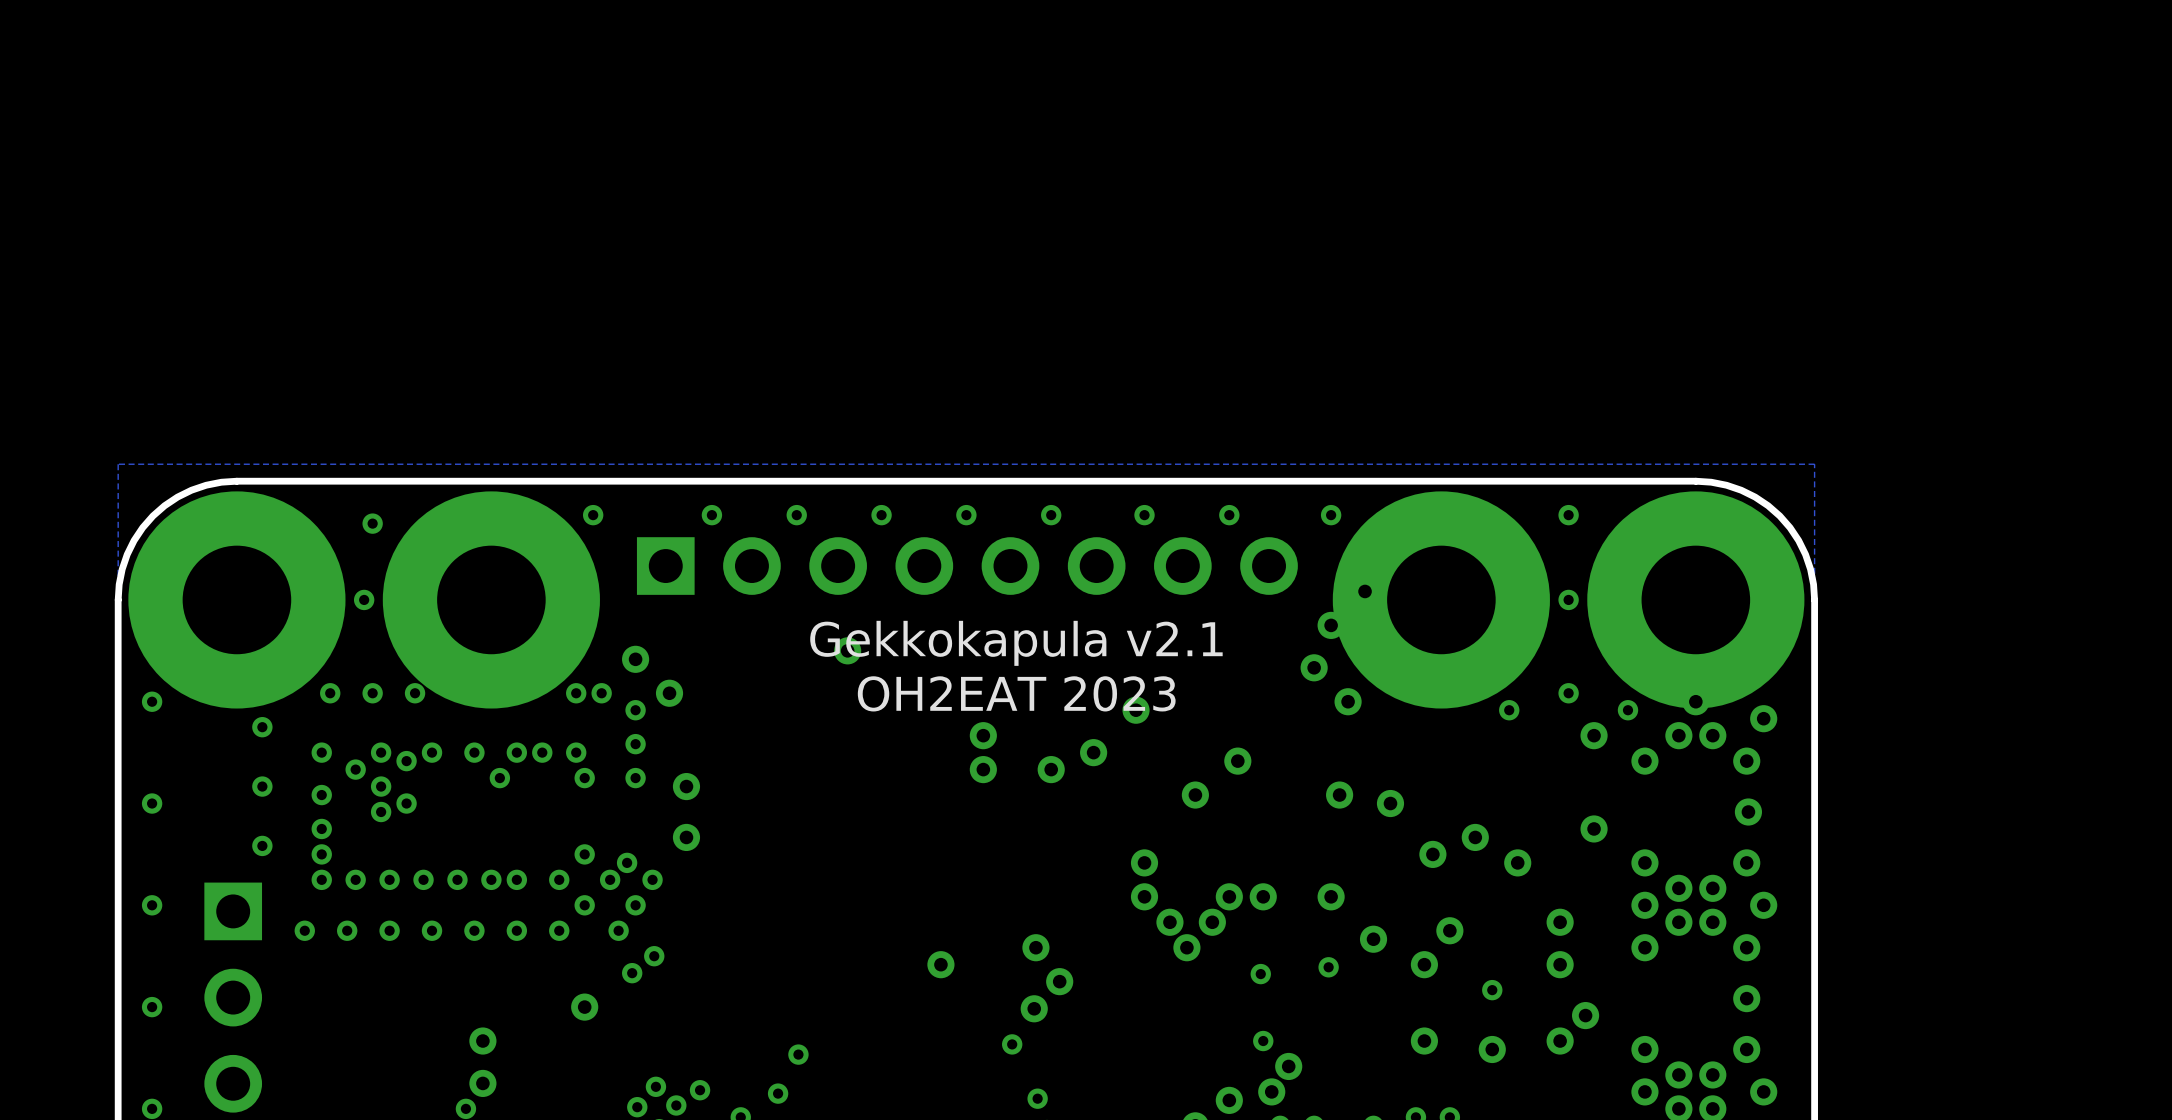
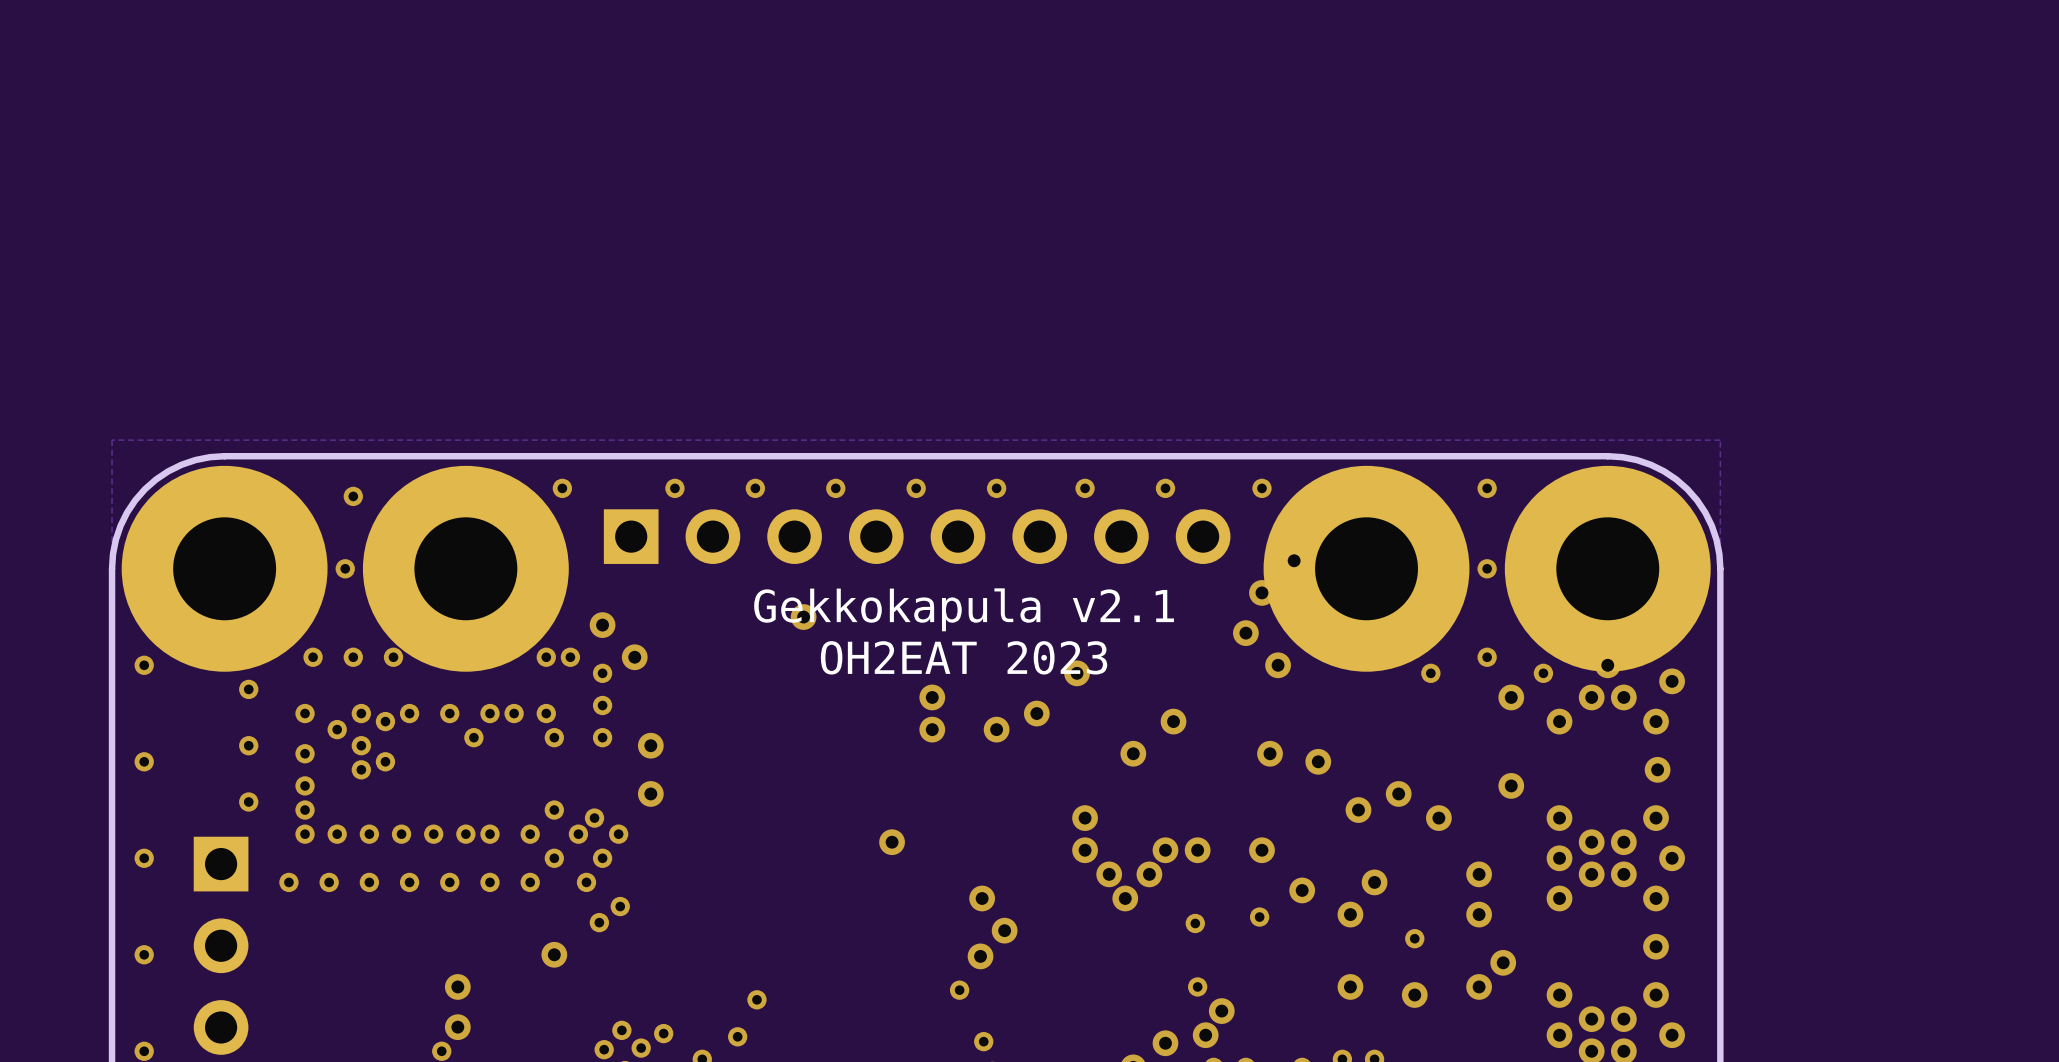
via position: (940, 964) -> (892, 842)

